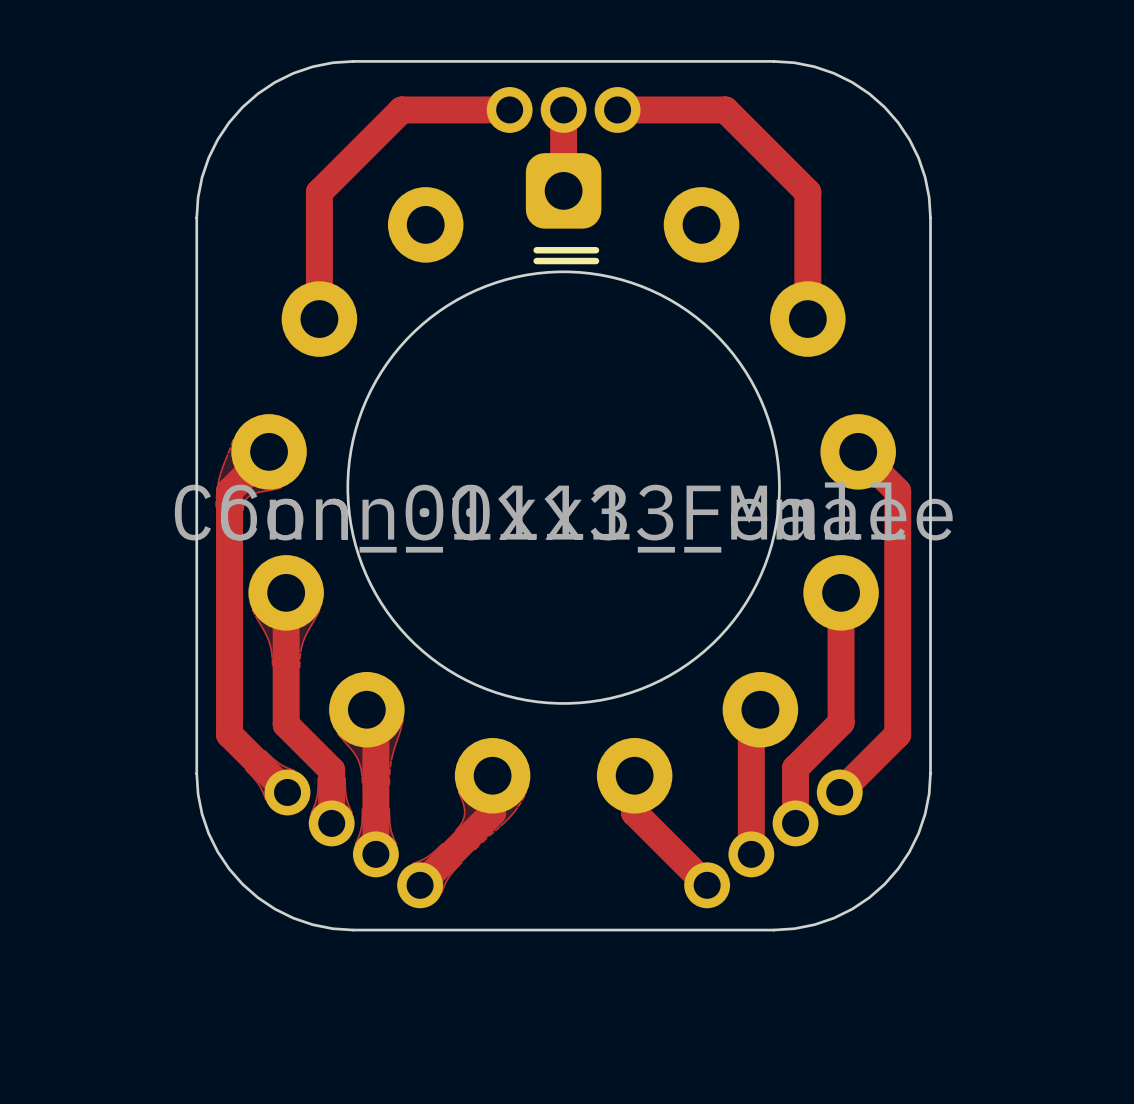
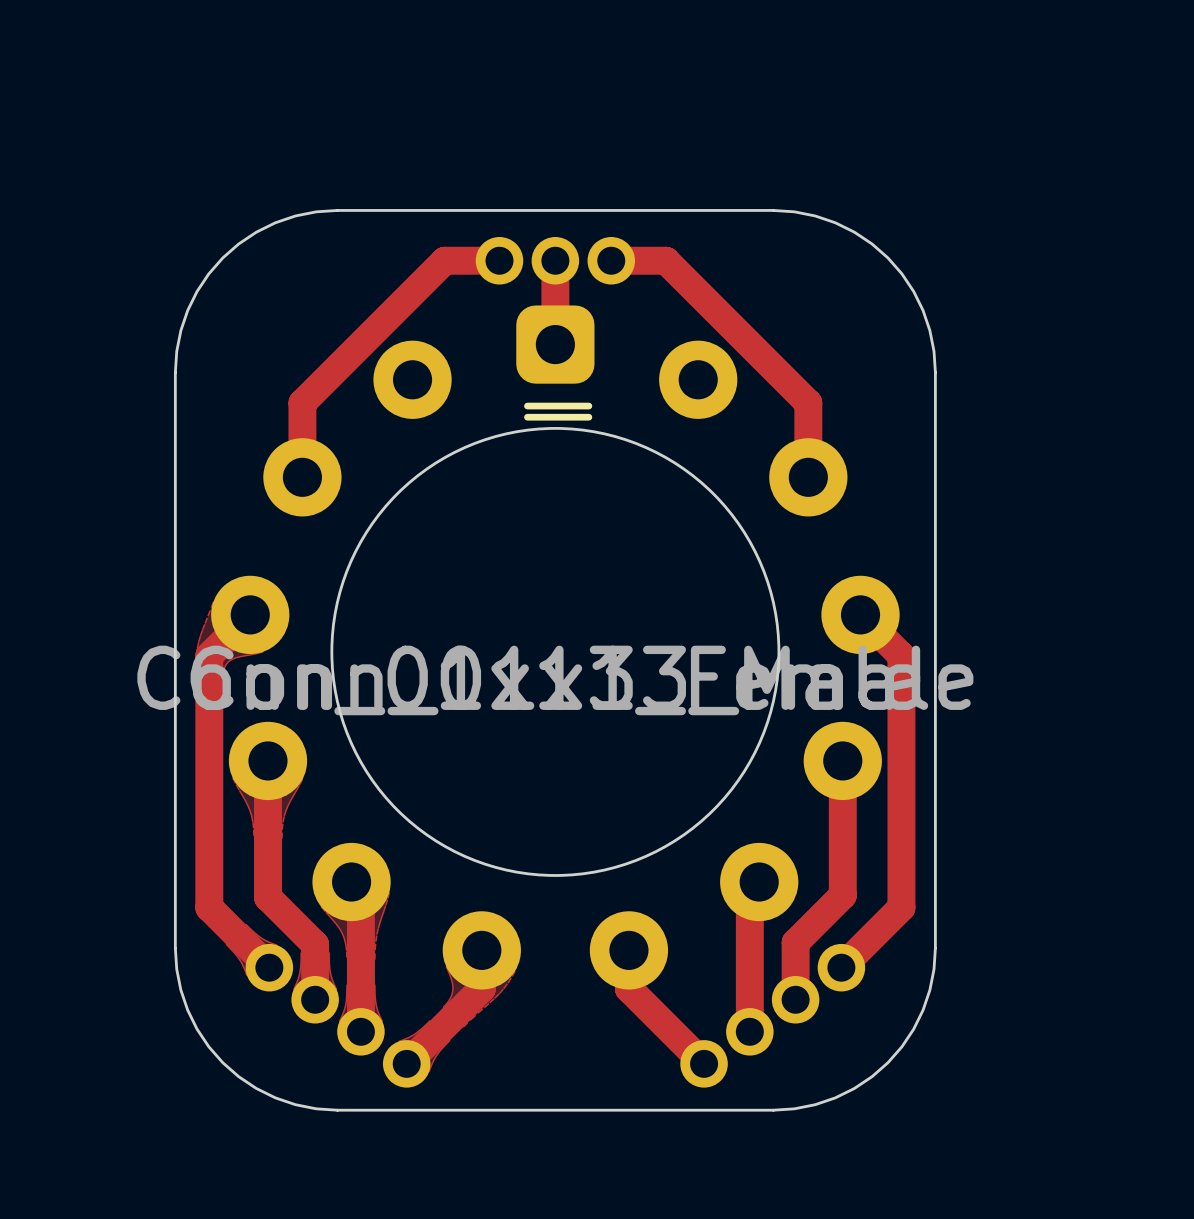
top track: (456, 109) (401, 109) (319, 192) (319, 247) -> (444, 260) (302, 403)
top track: (670, 109) (725, 109) (807, 192) (807, 247) -> (666, 260) (808, 403)

